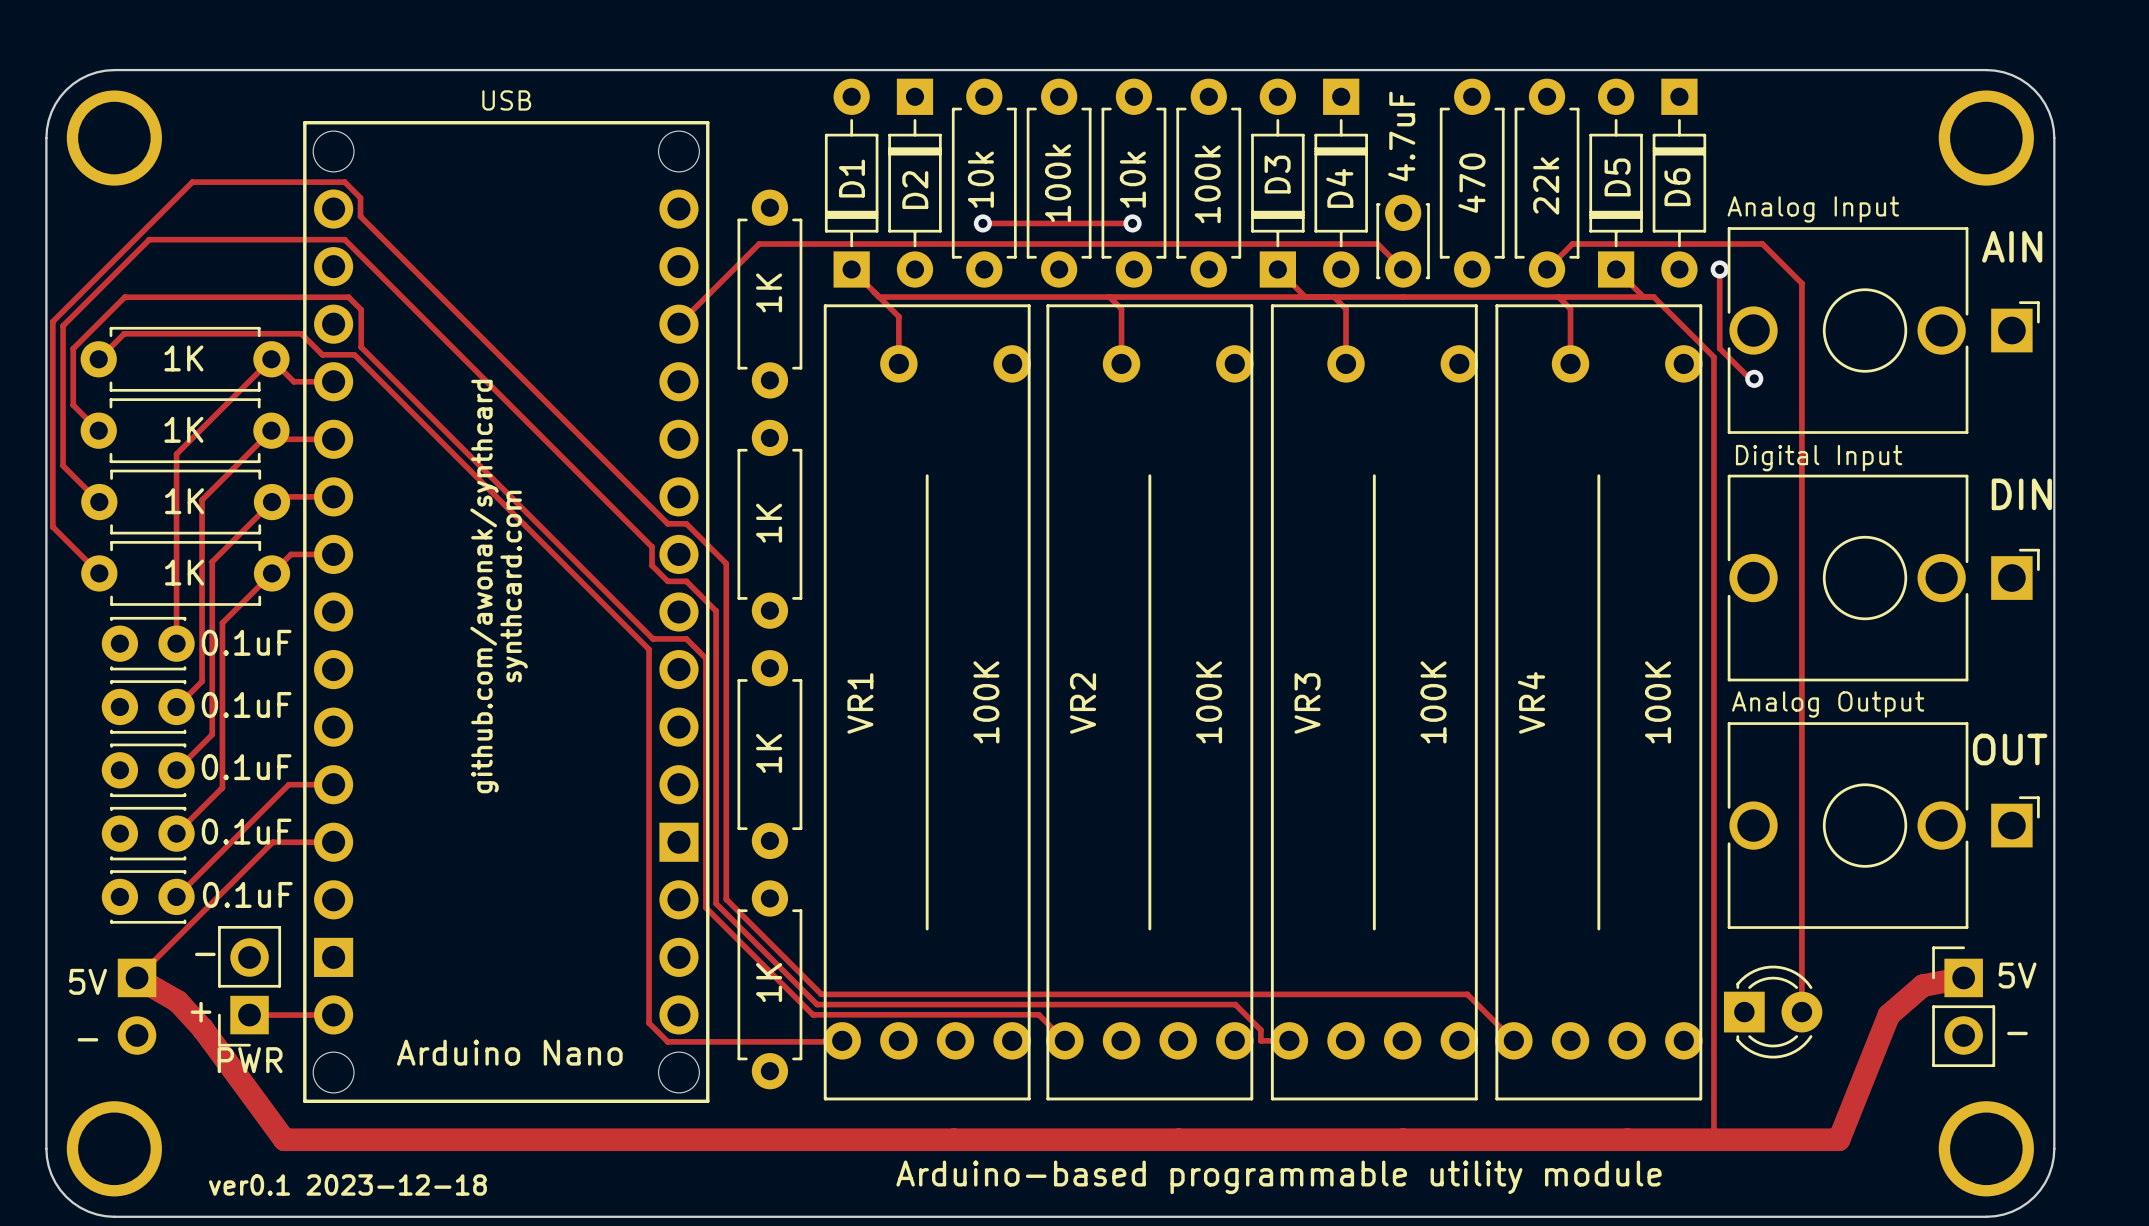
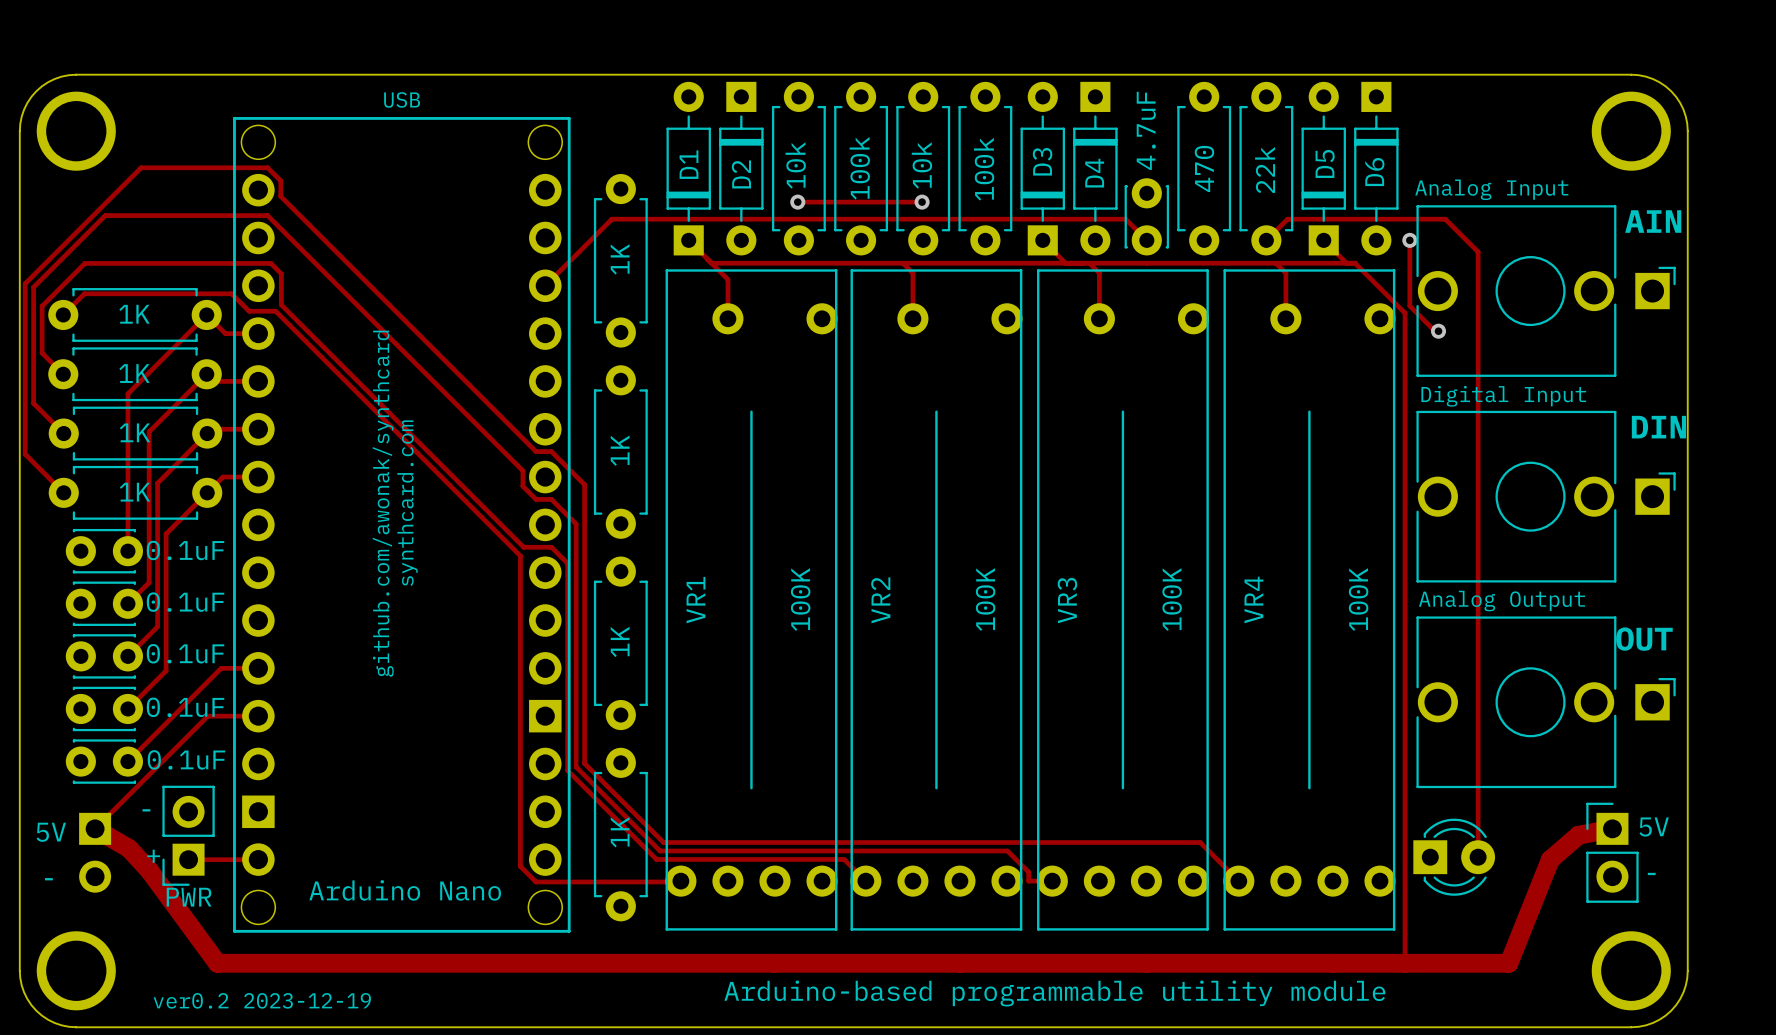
text: ver0.1 2023-12-18 (347, 1184) -> ver0.2 2023-12-19 (262, 1000)

